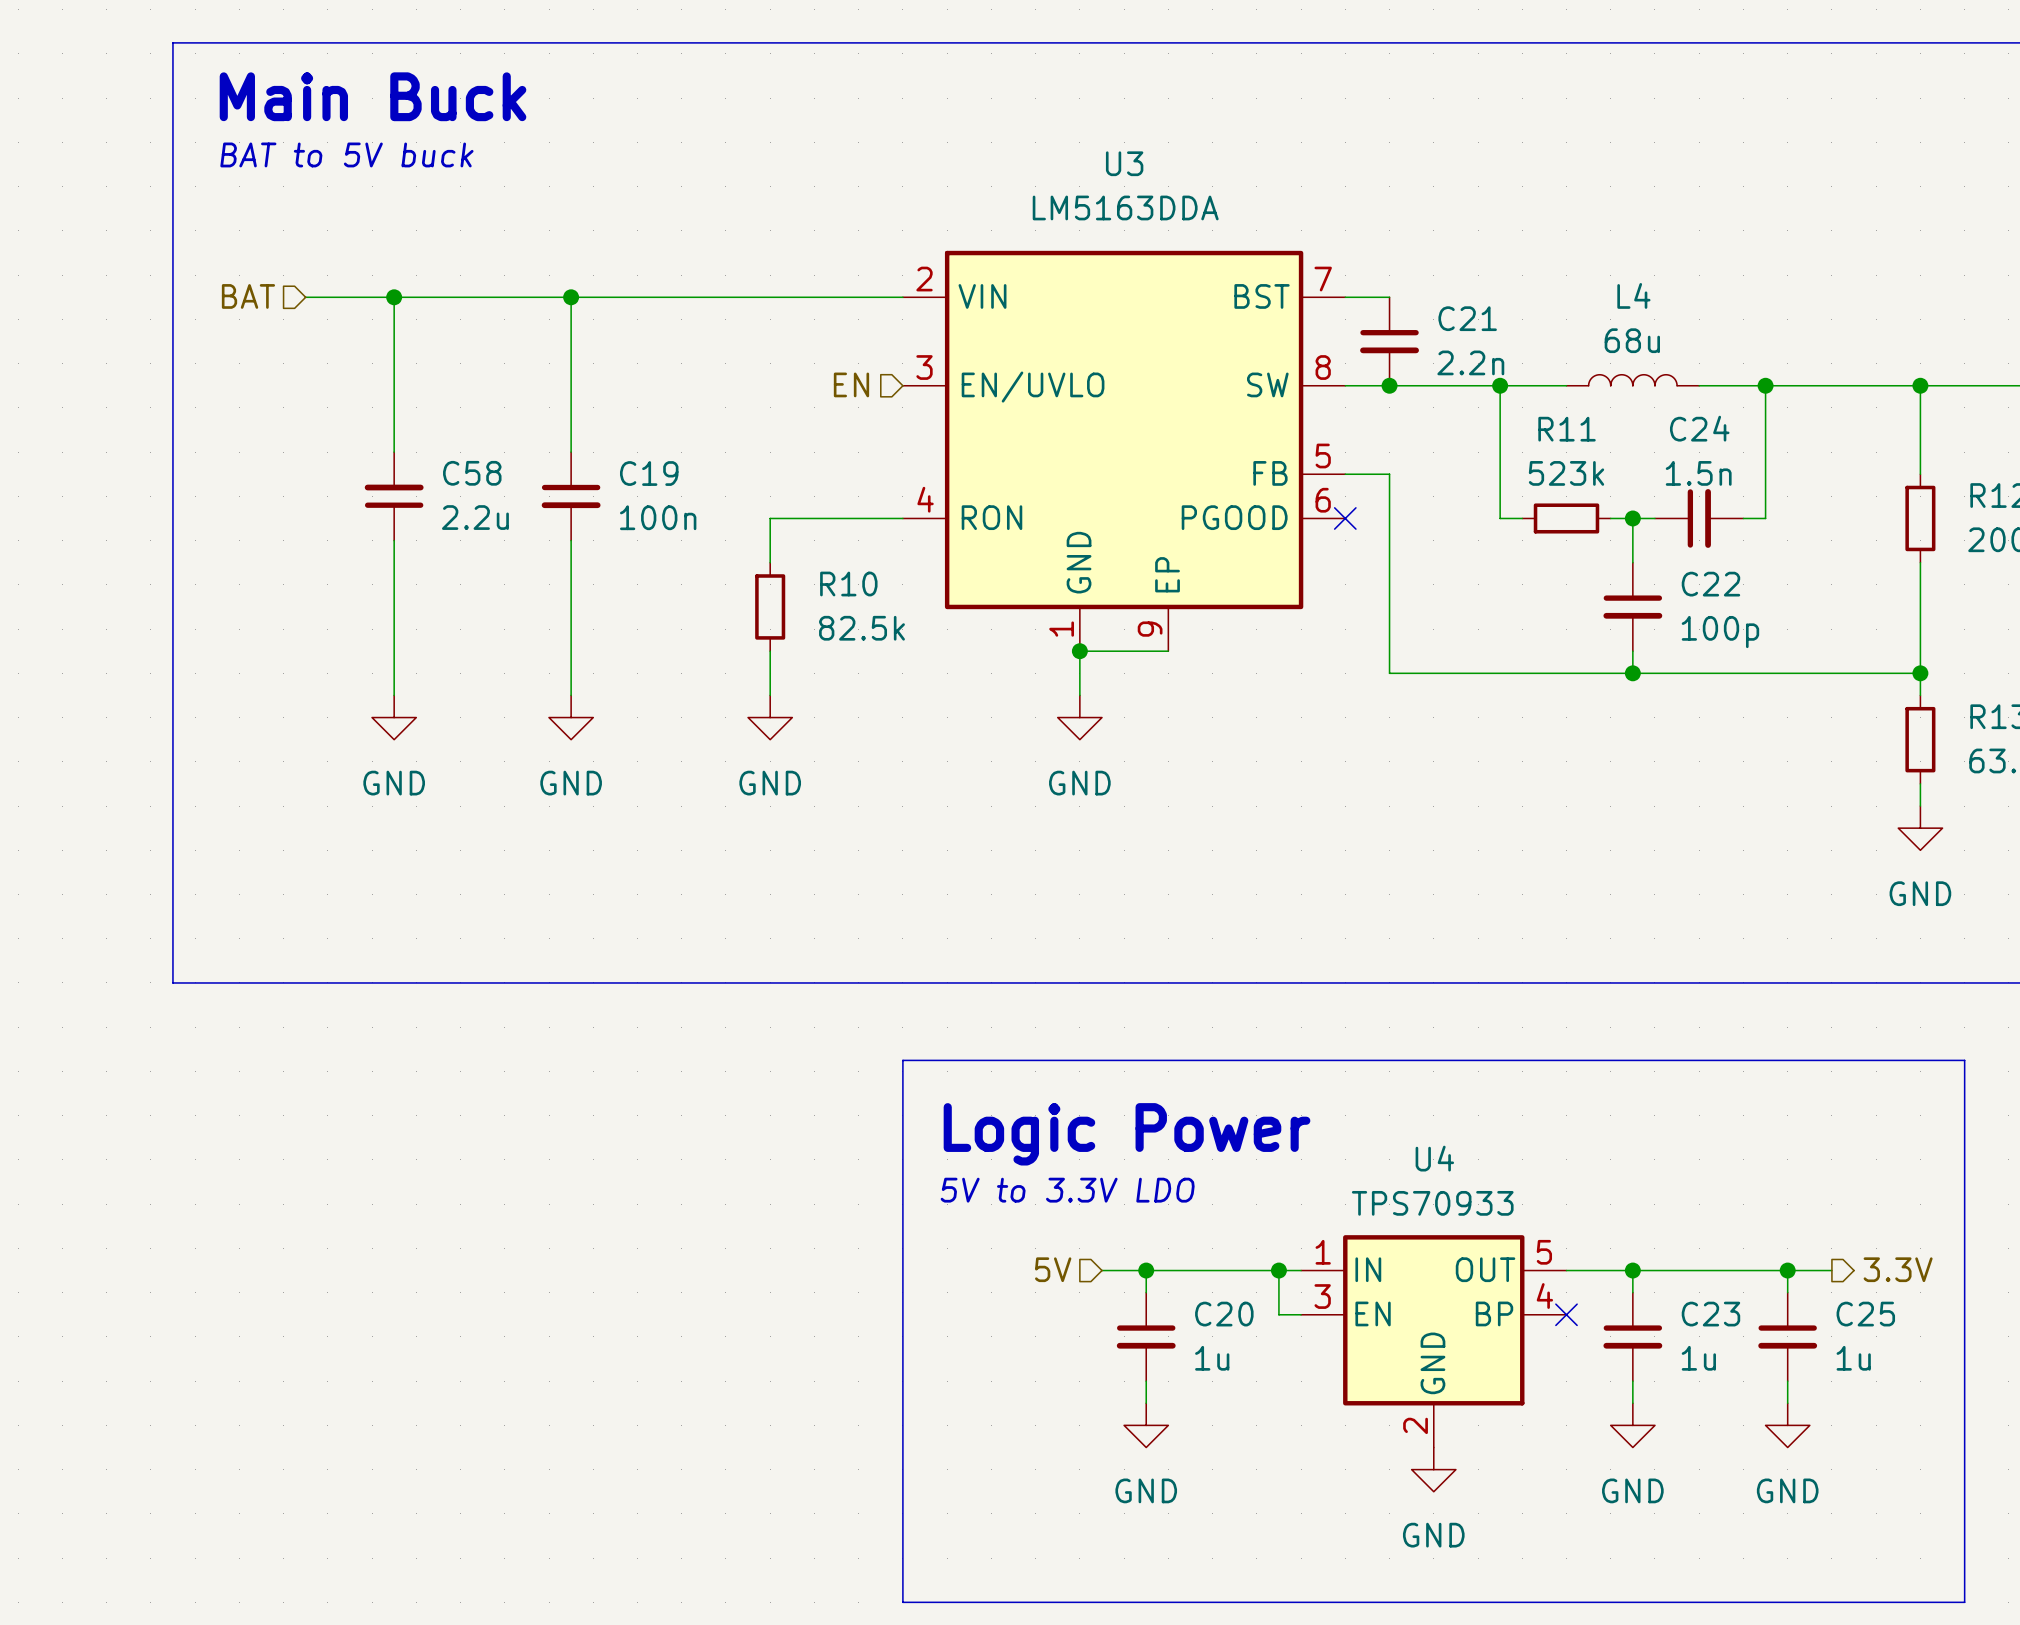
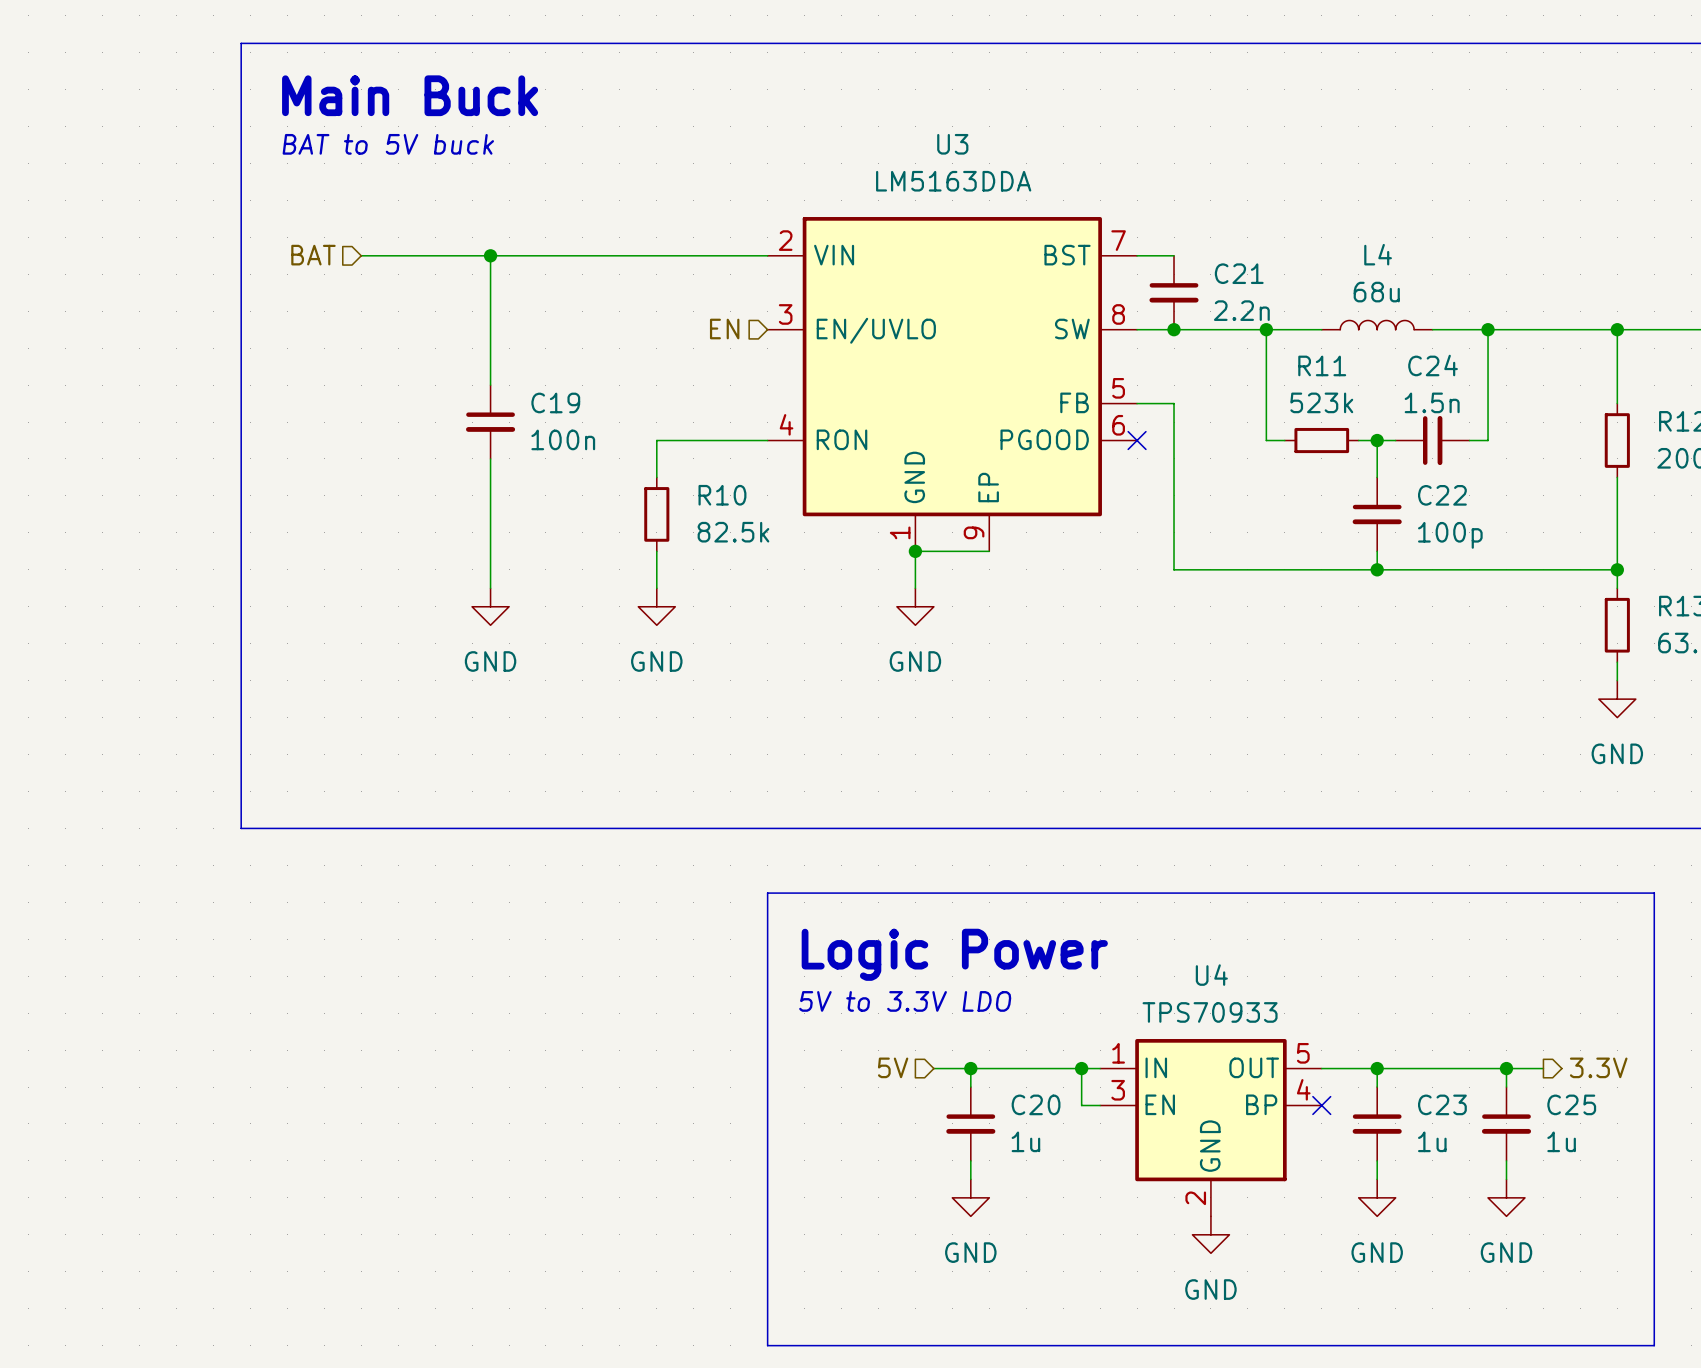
line: (272, 42) (172, 42) (172, 982) (272, 982) -> (241, 43) (241, 828)
text position: Main Buck (373, 96) -> Main Buck (410, 95)
text position: BAT to 5V buck (346, 154) -> BAT to 5V buck (388, 144)
hierarchical label position: BAT (248, 296) -> BAT (313, 255)
wire: (305, 297) (416, 297) -> none
wire: (394, 297) (394, 452) -> none
junction: (394, 297) -> none
C58: 2.2u (394, 496) -> none
wire: (394, 540) (394, 695) -> none
power symbol: GND (394, 717) -> none

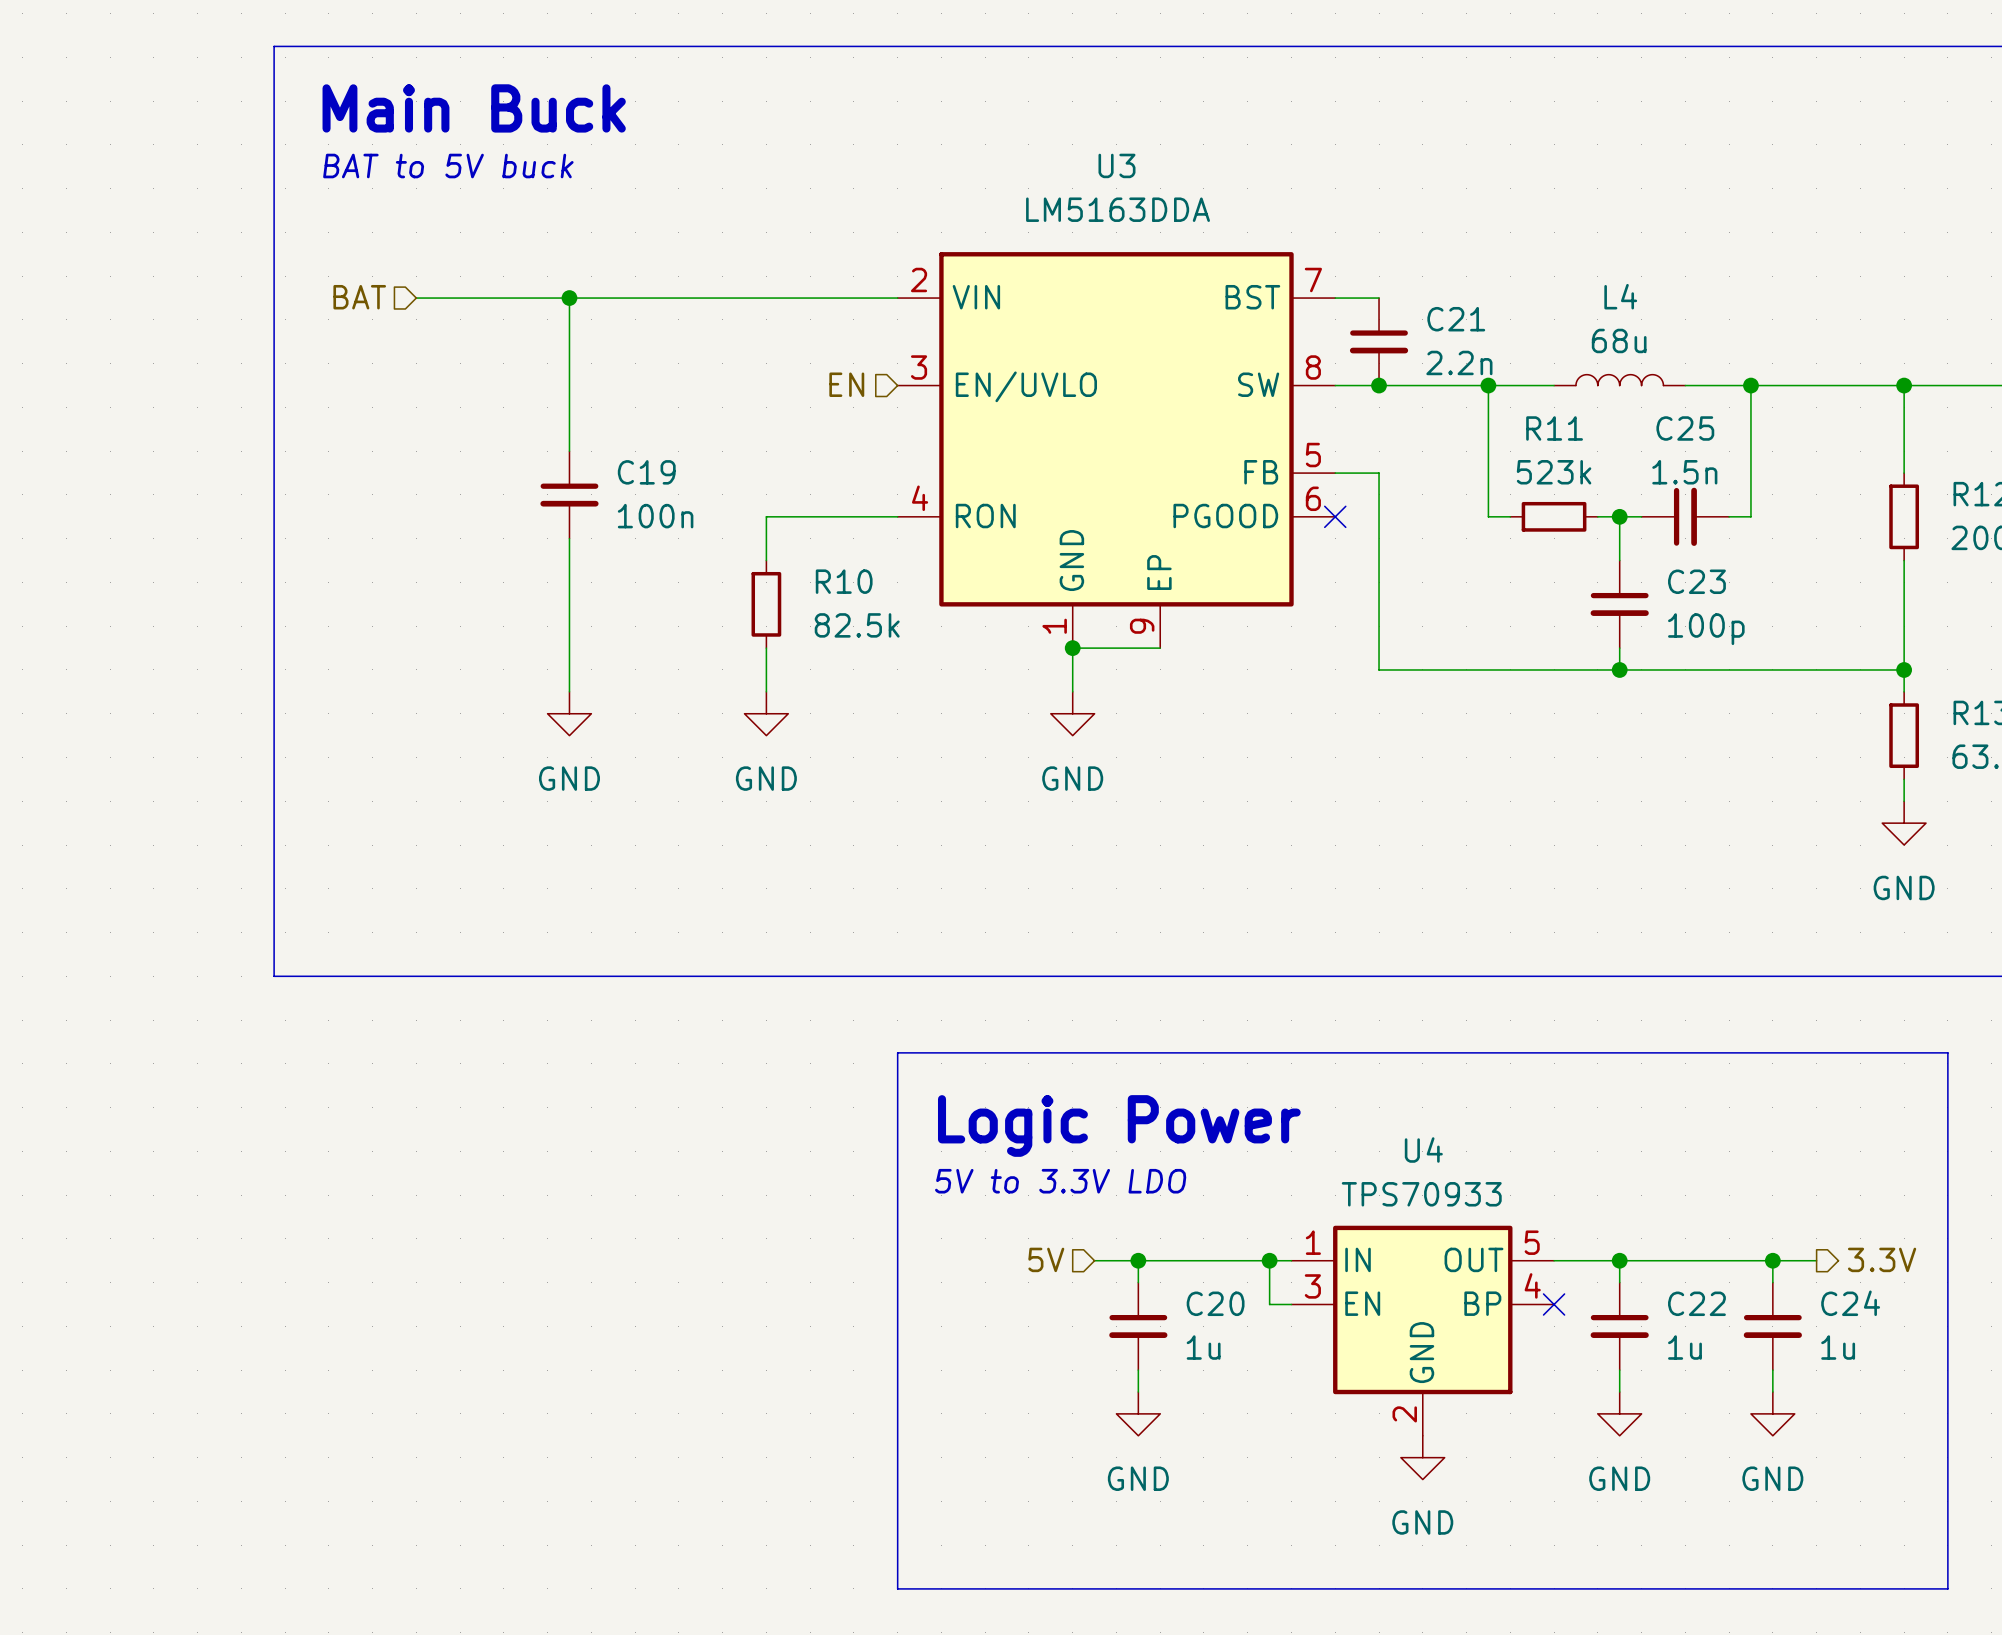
C24 name: C24 (1433, 365) -> C25 (1685, 428)
C22 name: C22 (1442, 495) -> C23 (1696, 581)
C23 name: C23 (1442, 1104) -> C22 (1696, 1303)
C25 name: C25 (1571, 1104) -> C24 (1850, 1303)

